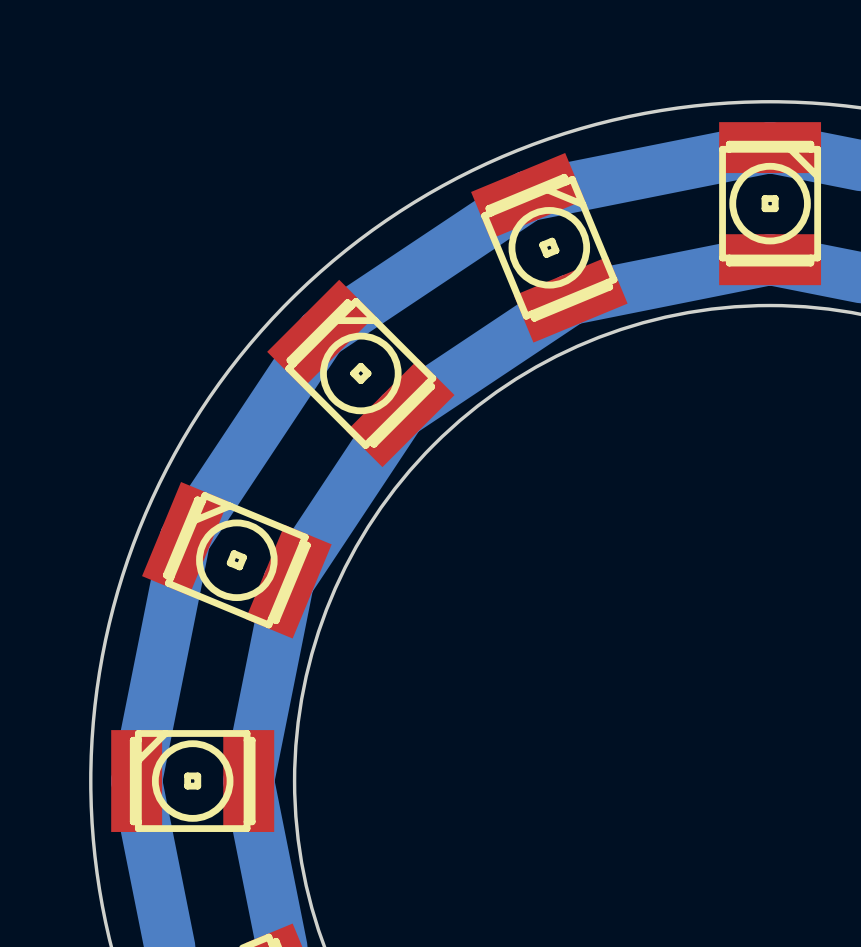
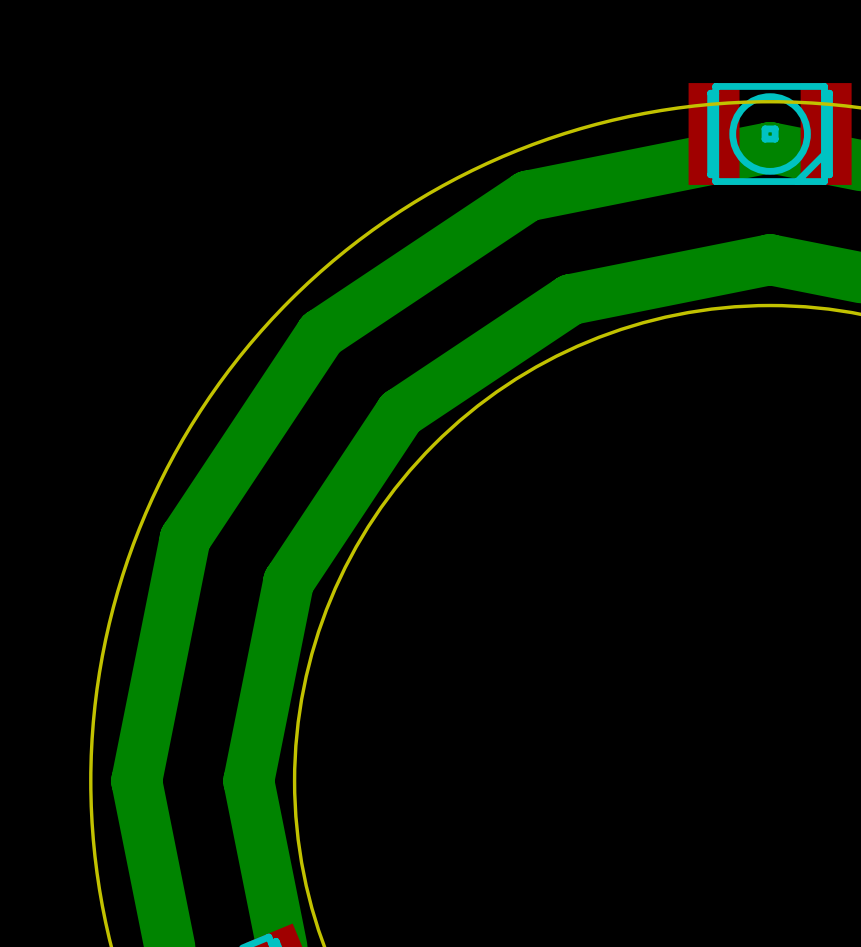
part rotation: 0° (770, 203) -> 90° clockwise (770, 134)
part: (549, 247) -> none
part: (360, 373) -> none
part: (236, 560) -> none
part: (192, 781) -> none

